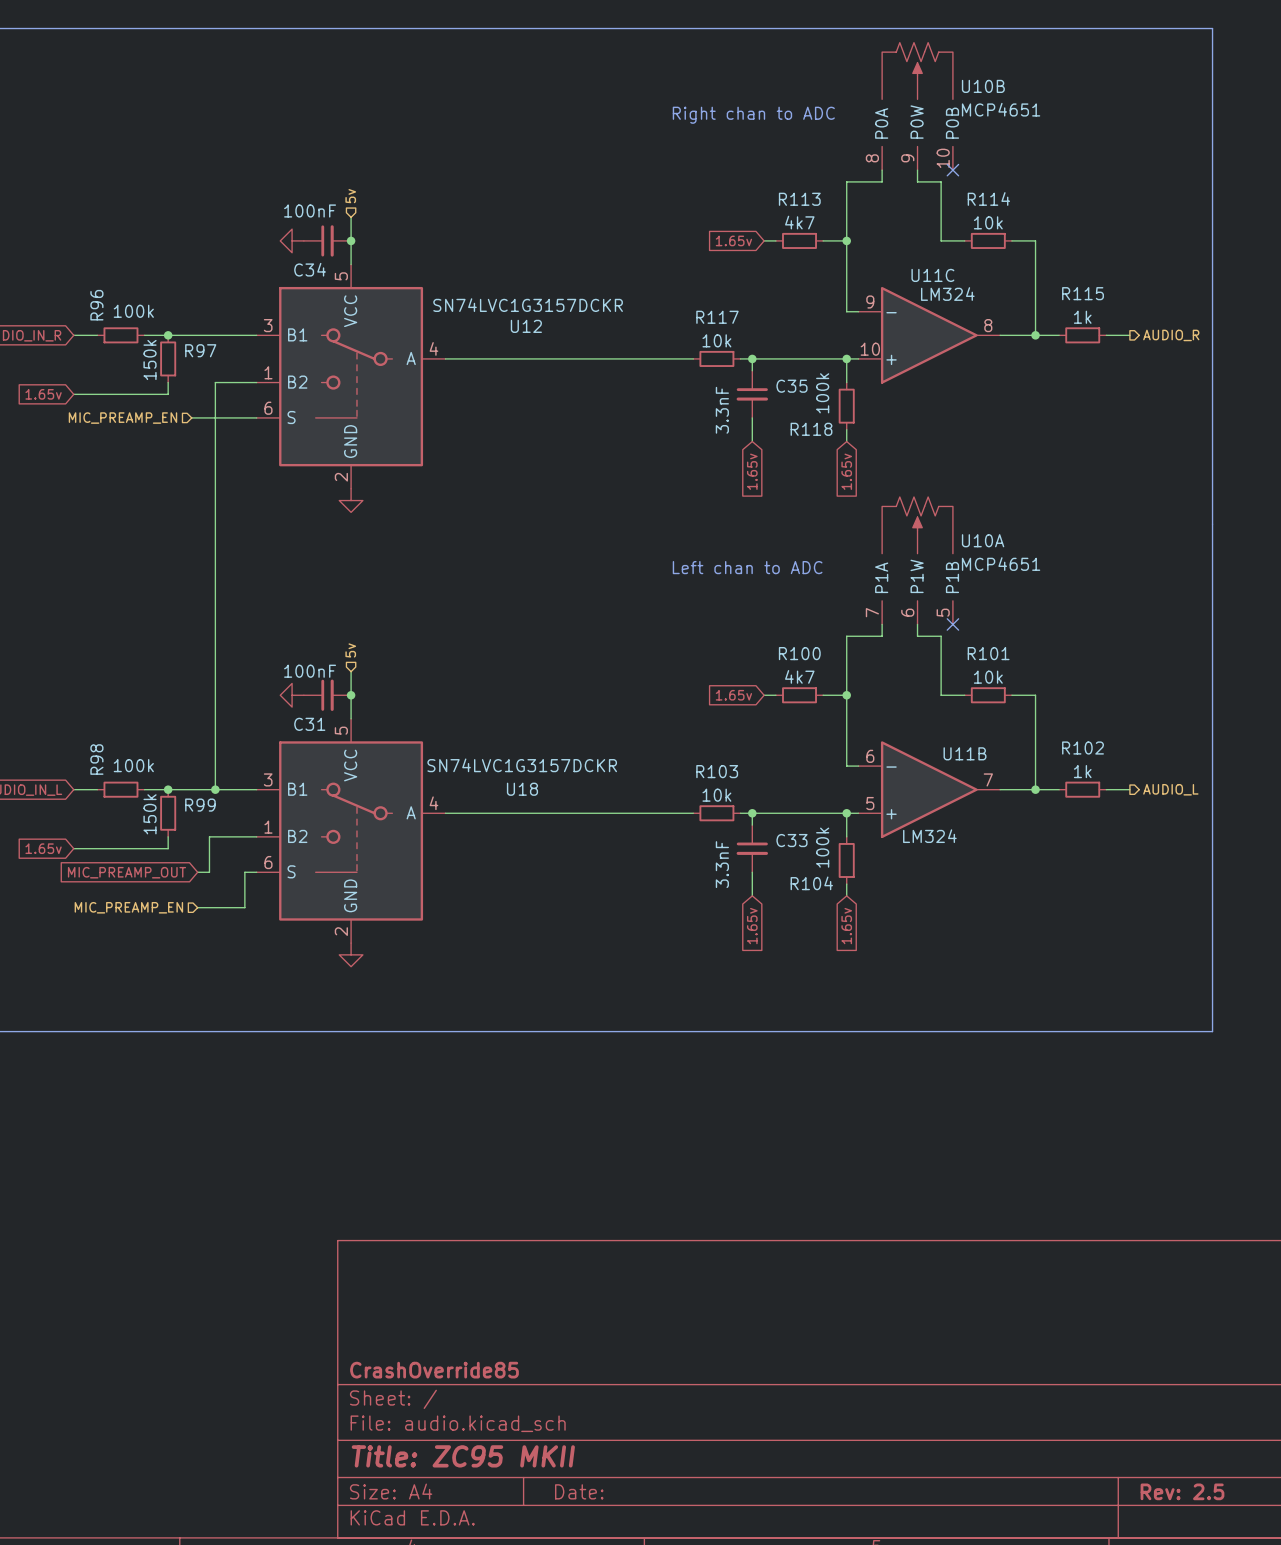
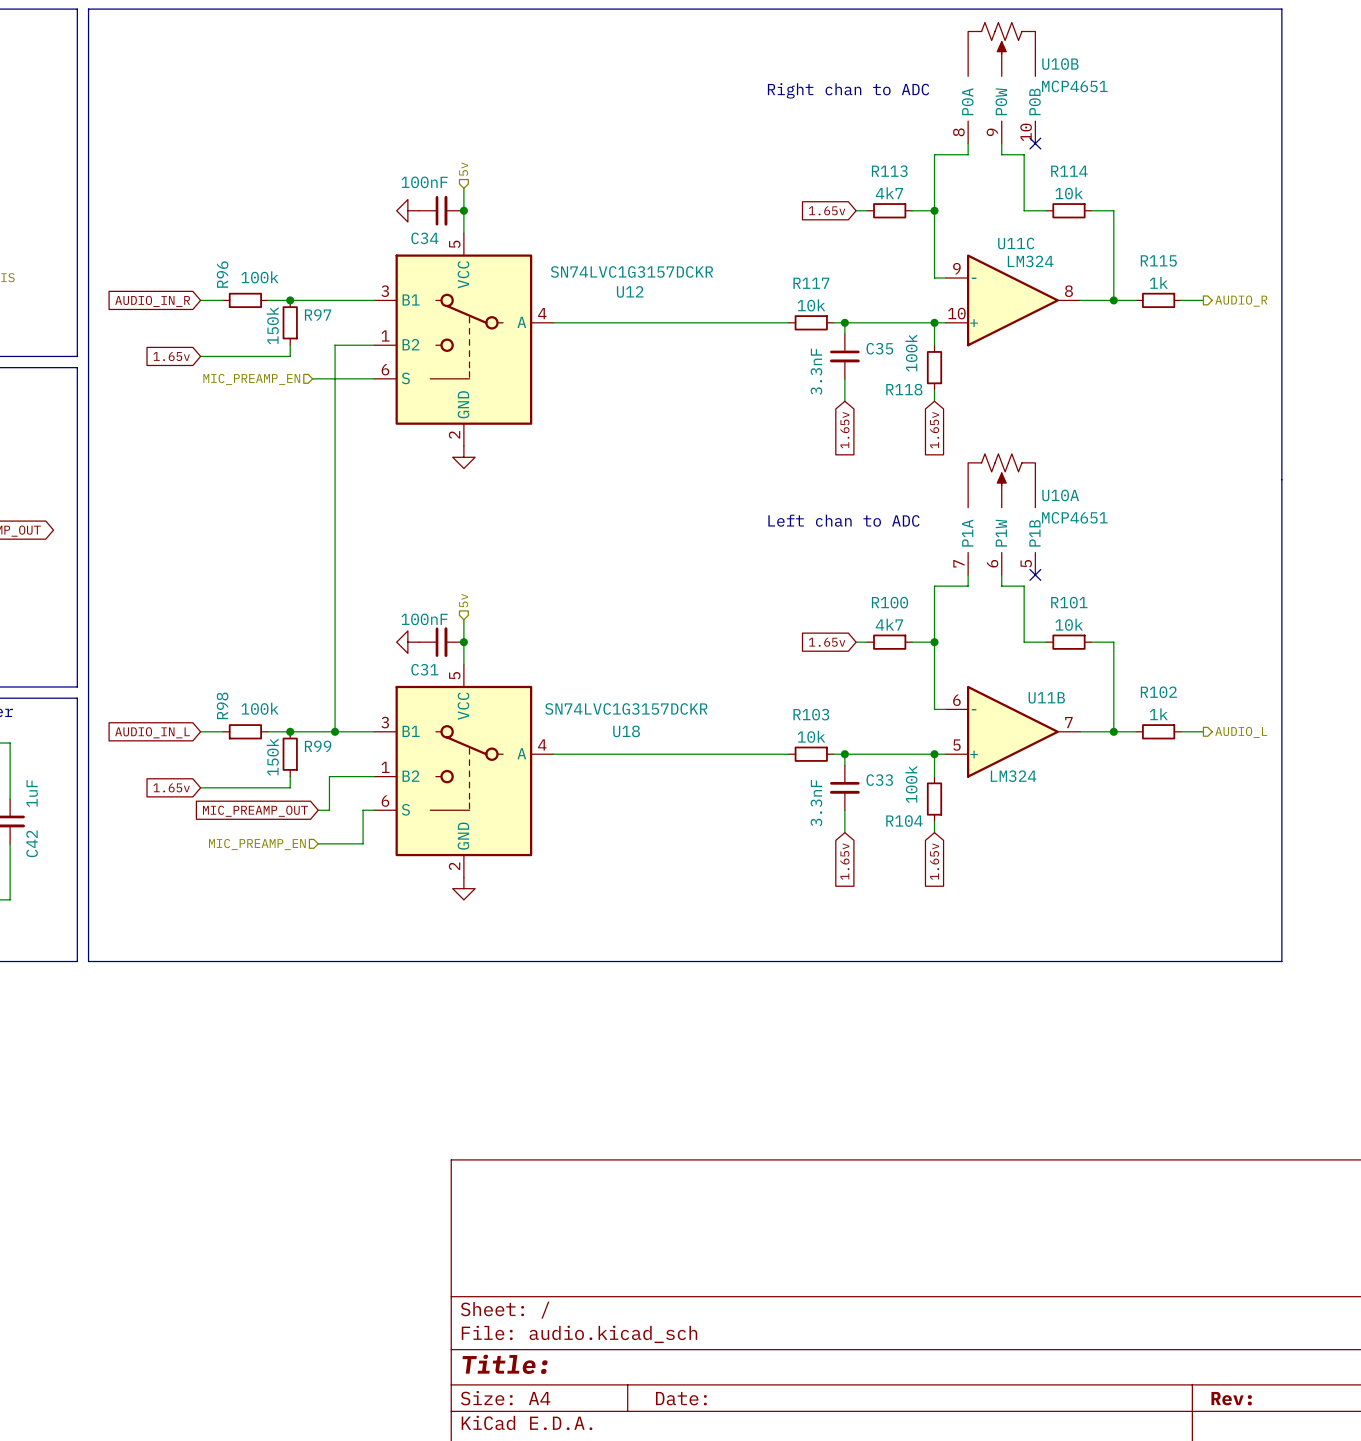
title block: CrashOverride85 (434, 1370) -> none
title block: Title: ZC95 MKII (463, 1456) -> Title: (505, 1364)
title block: Rev: 2.5 (1182, 1491) -> Rev: (1231, 1398)

